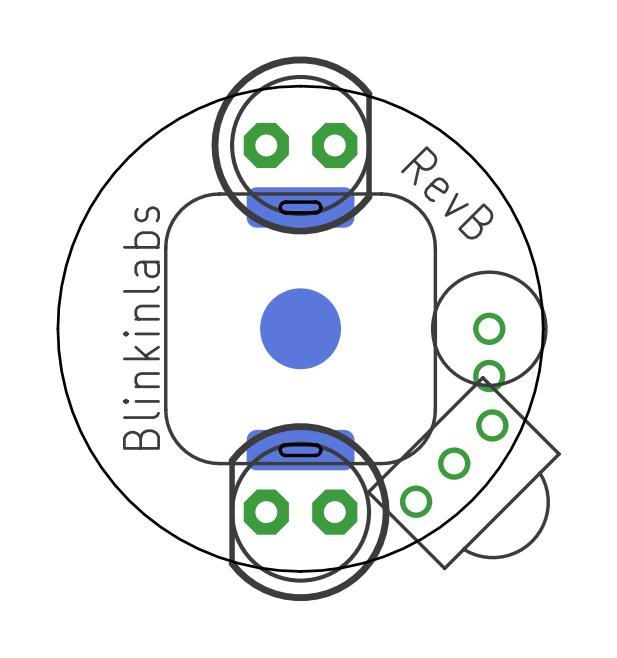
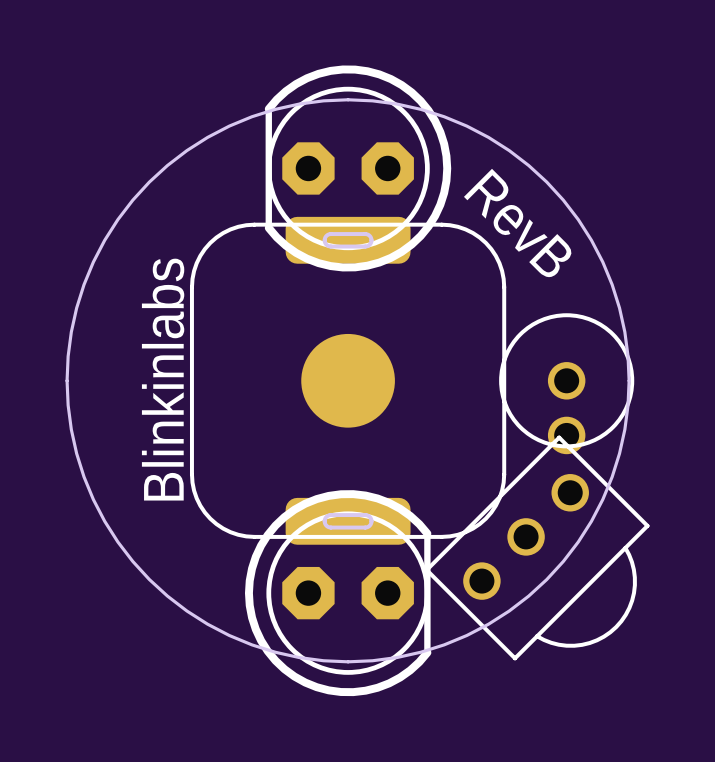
part rotation: 0° (291, 145) -> 180° (358, 168)
part rotation: 0° (309, 512) -> 180° (338, 593)

